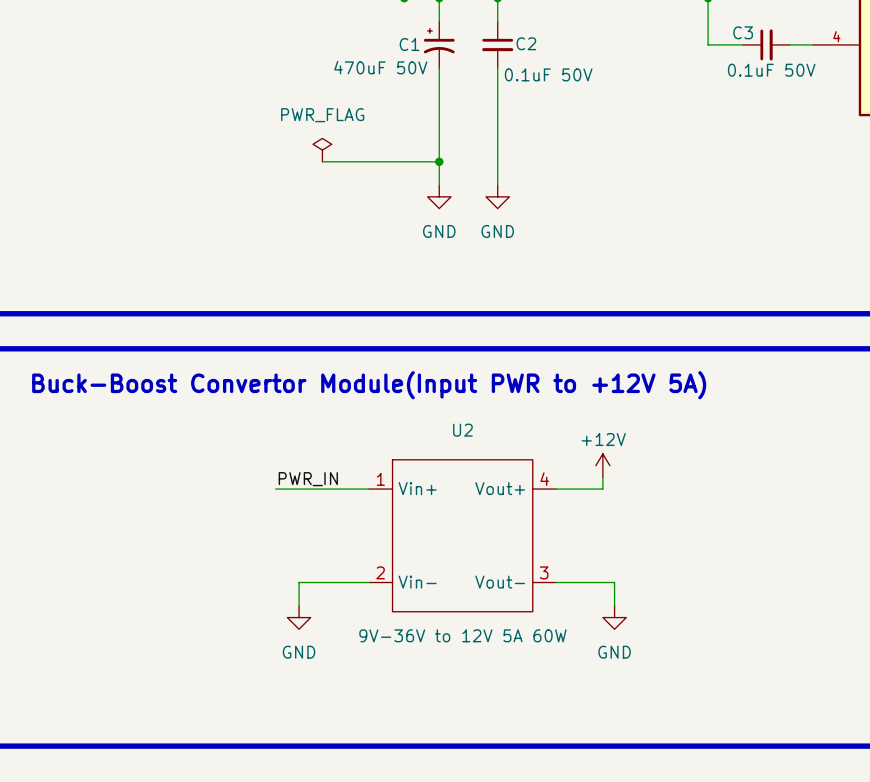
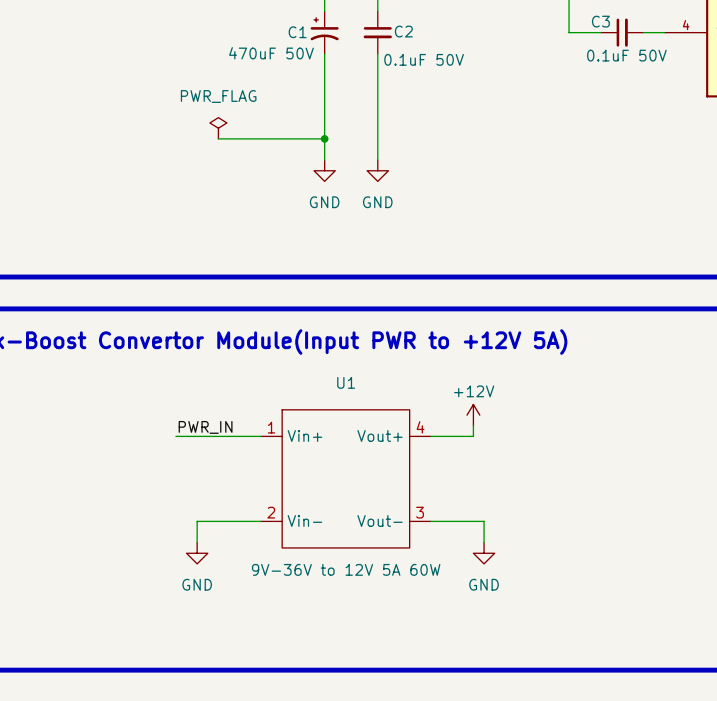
U2 name: U2 (462, 430) -> U1 (346, 382)

